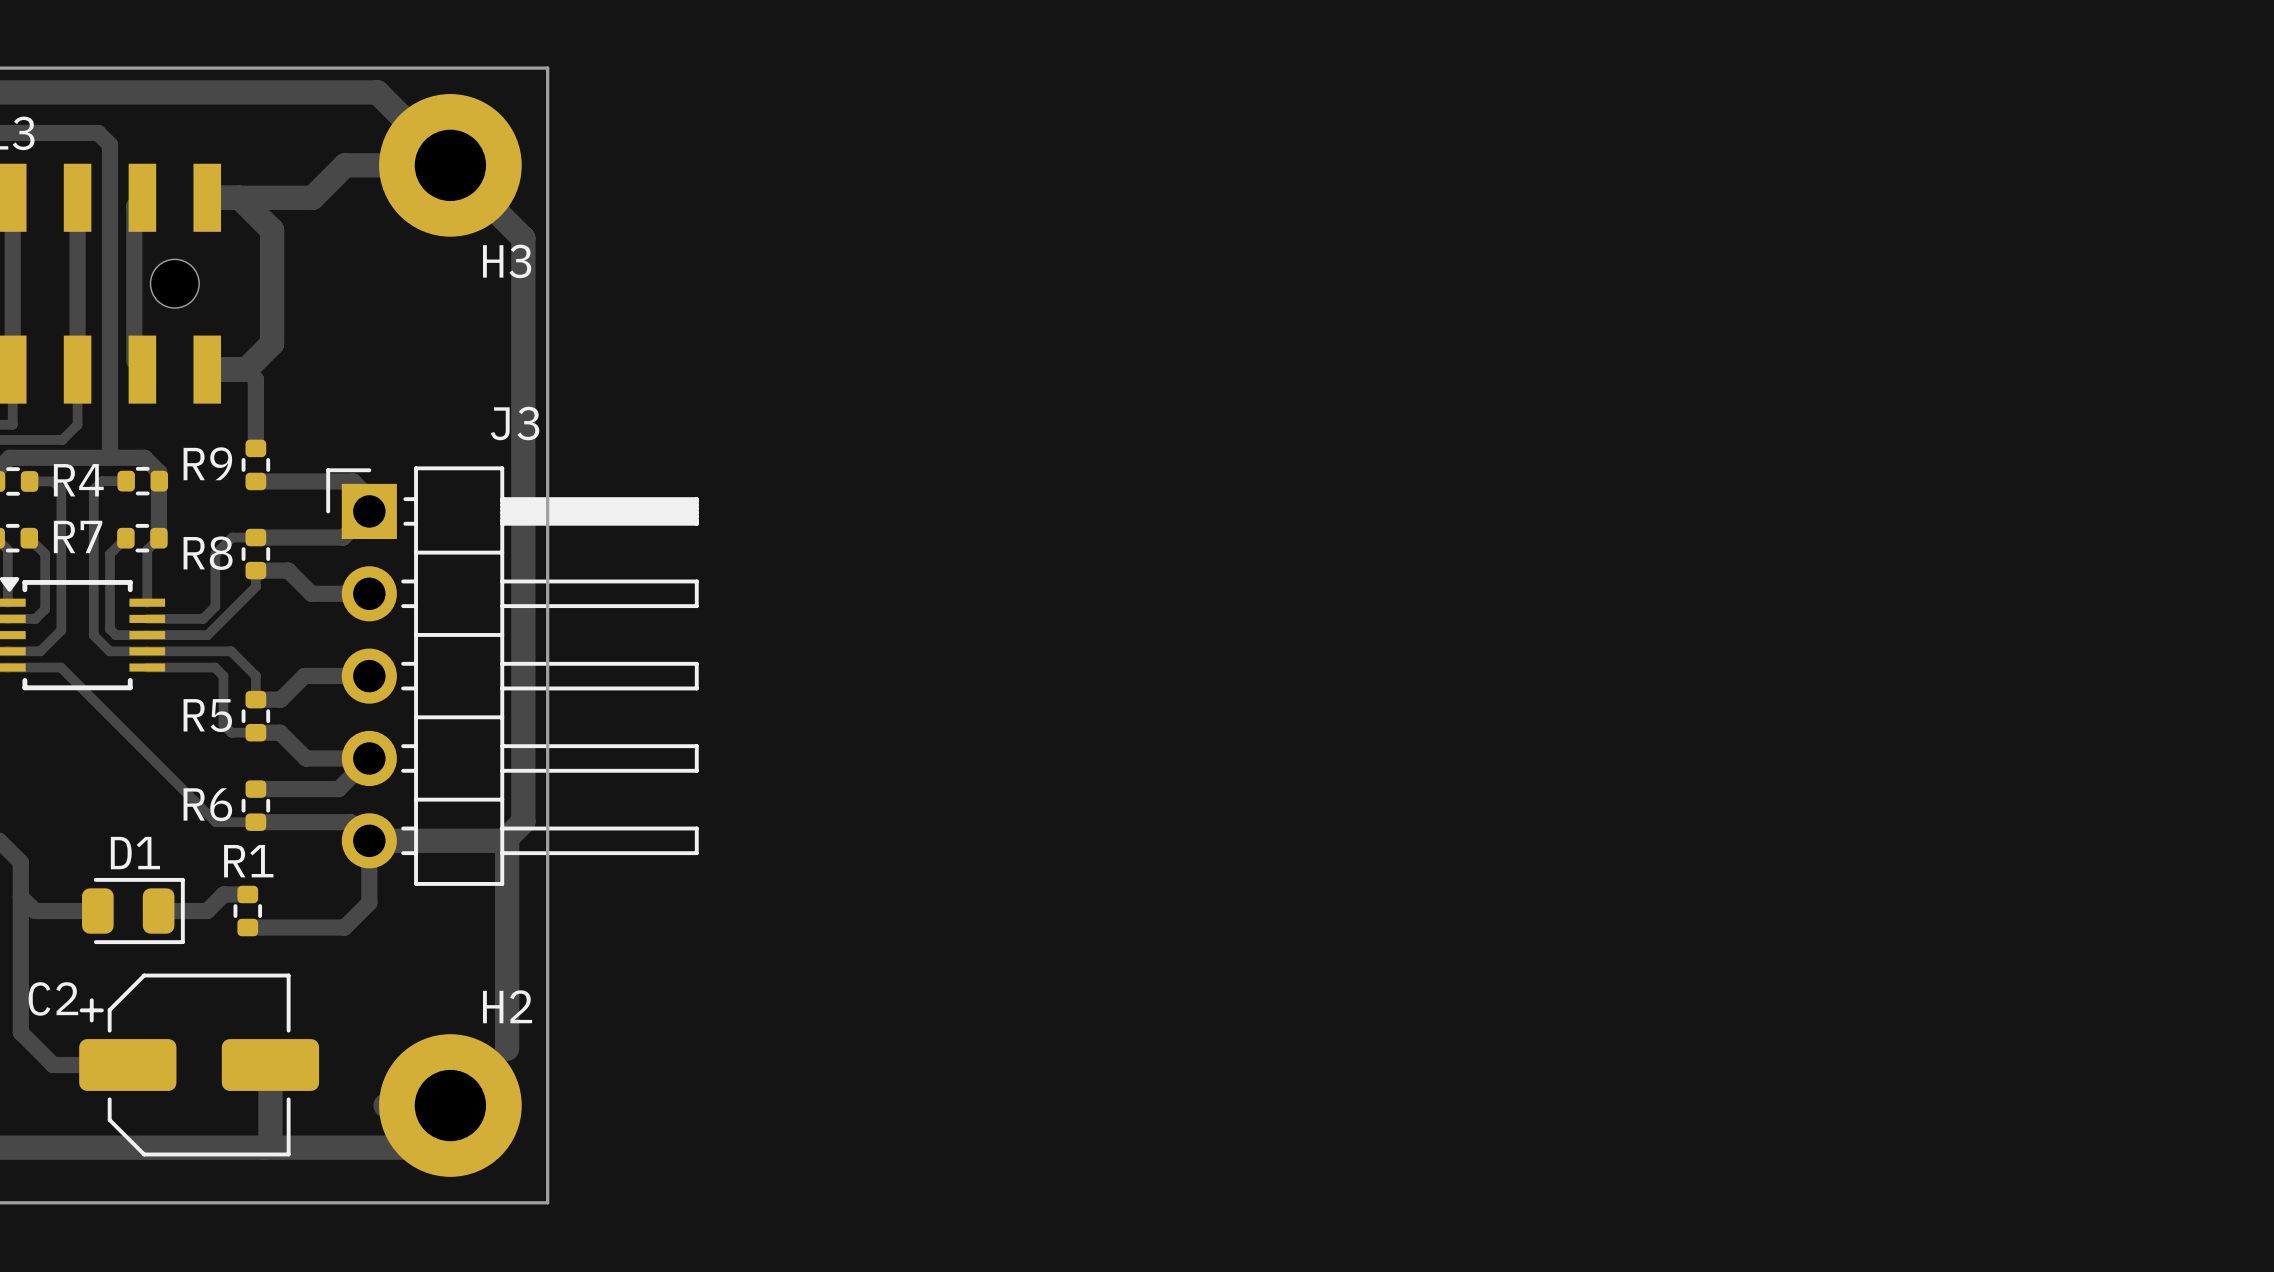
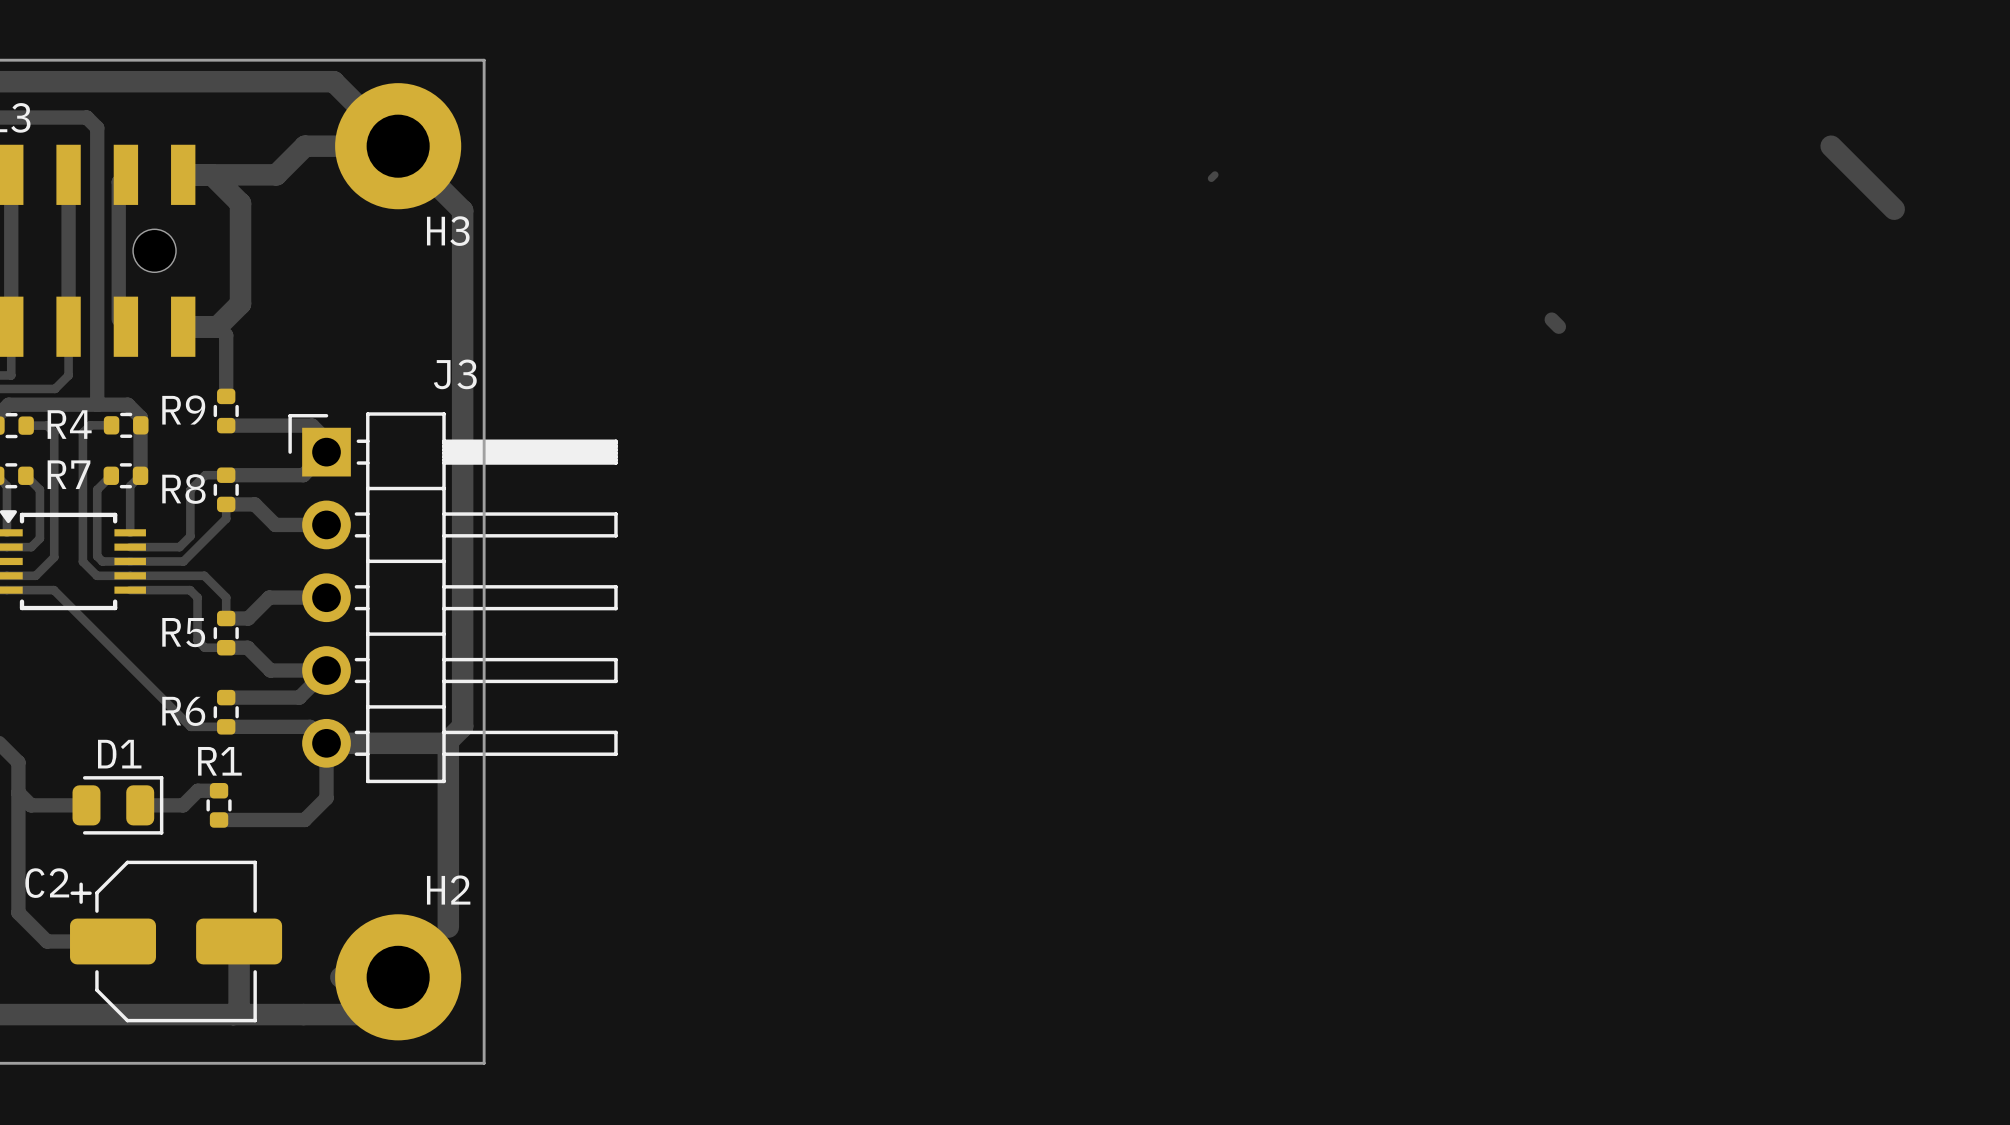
track: none -> (1831, 146) (1894, 209)
track: none -> (1214, 174) (1211, 178)
track: none -> (1551, 319) (1558, 326)

